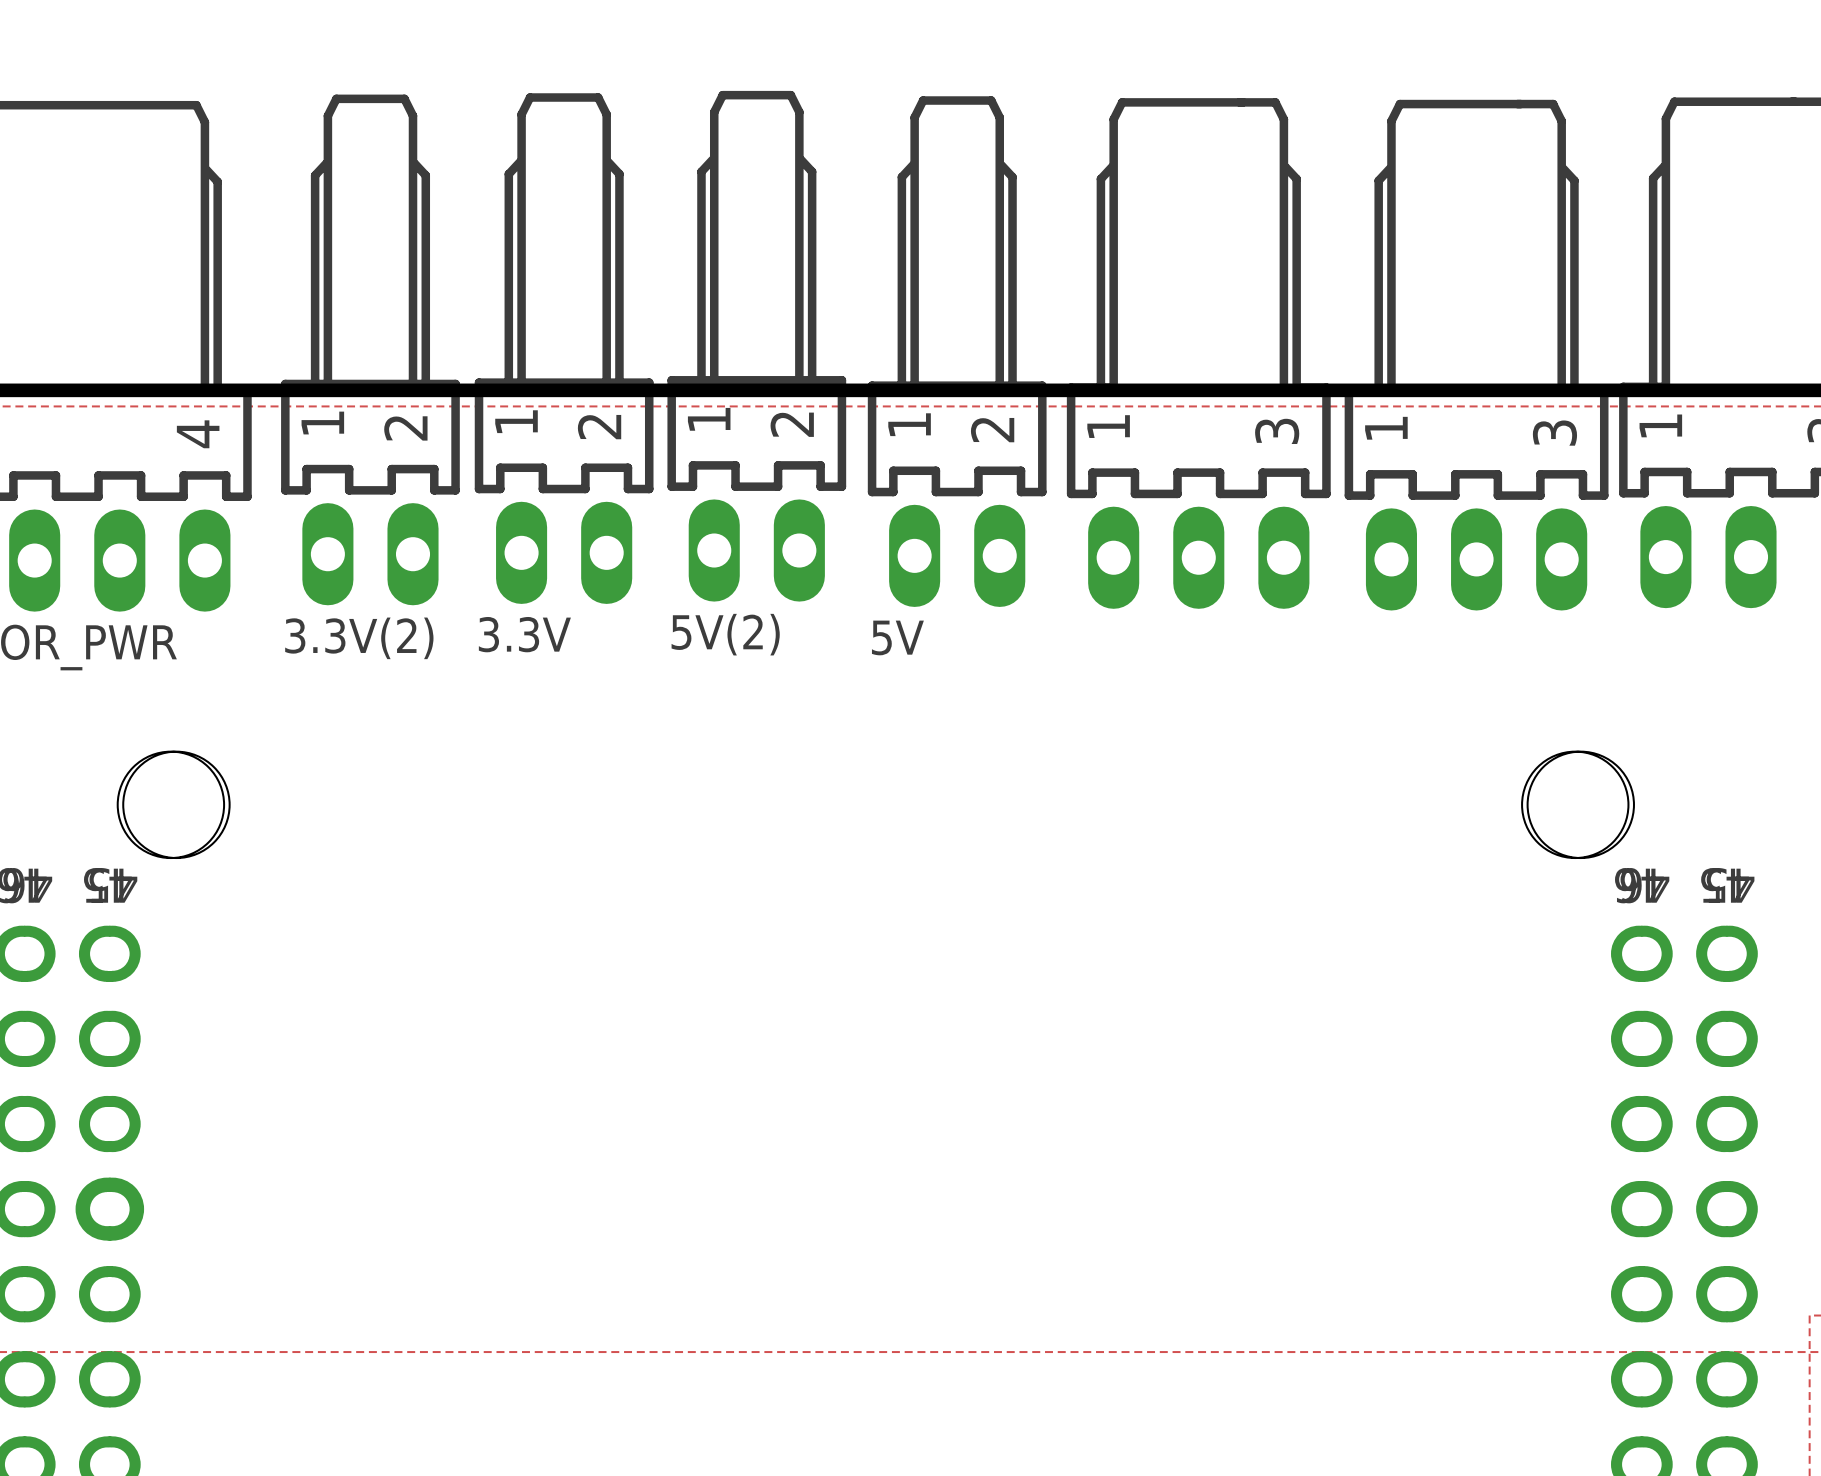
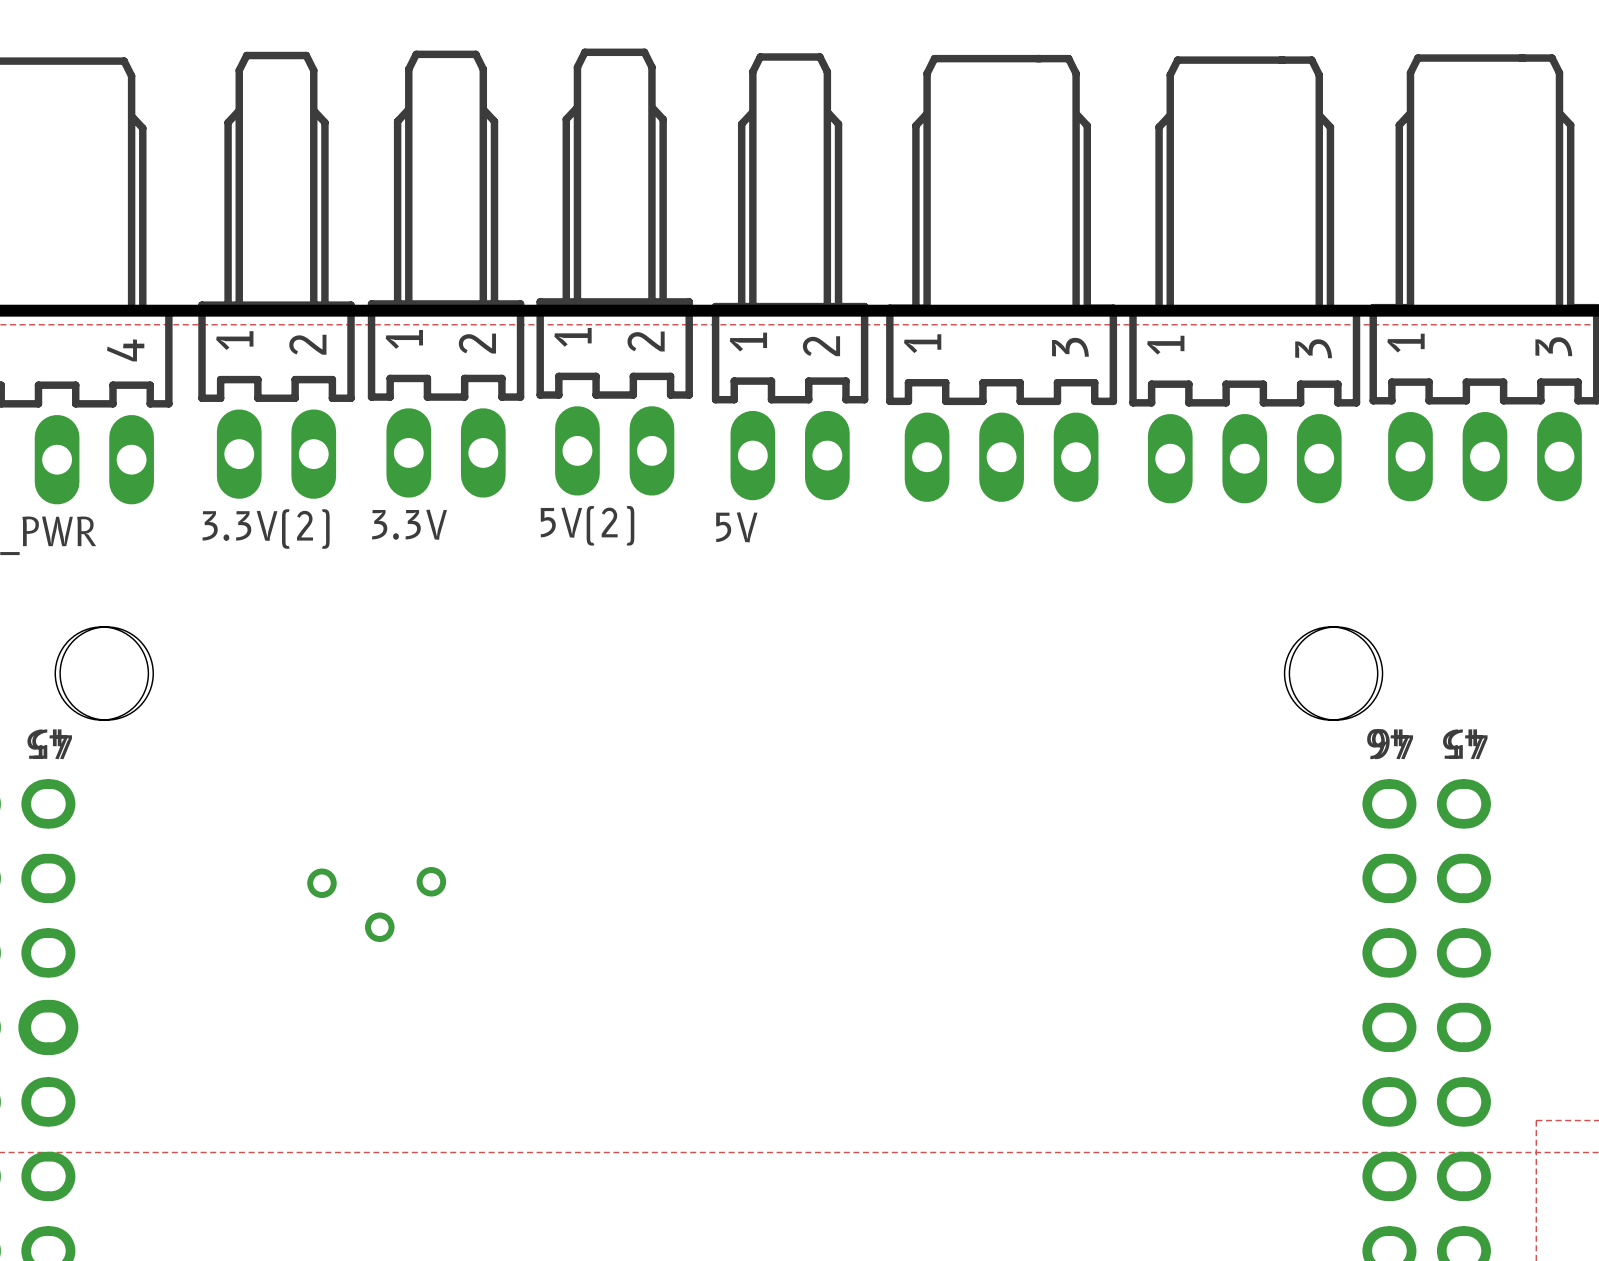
via: none -> (431, 881)
via: none -> (321, 883)
via: none -> (379, 927)

